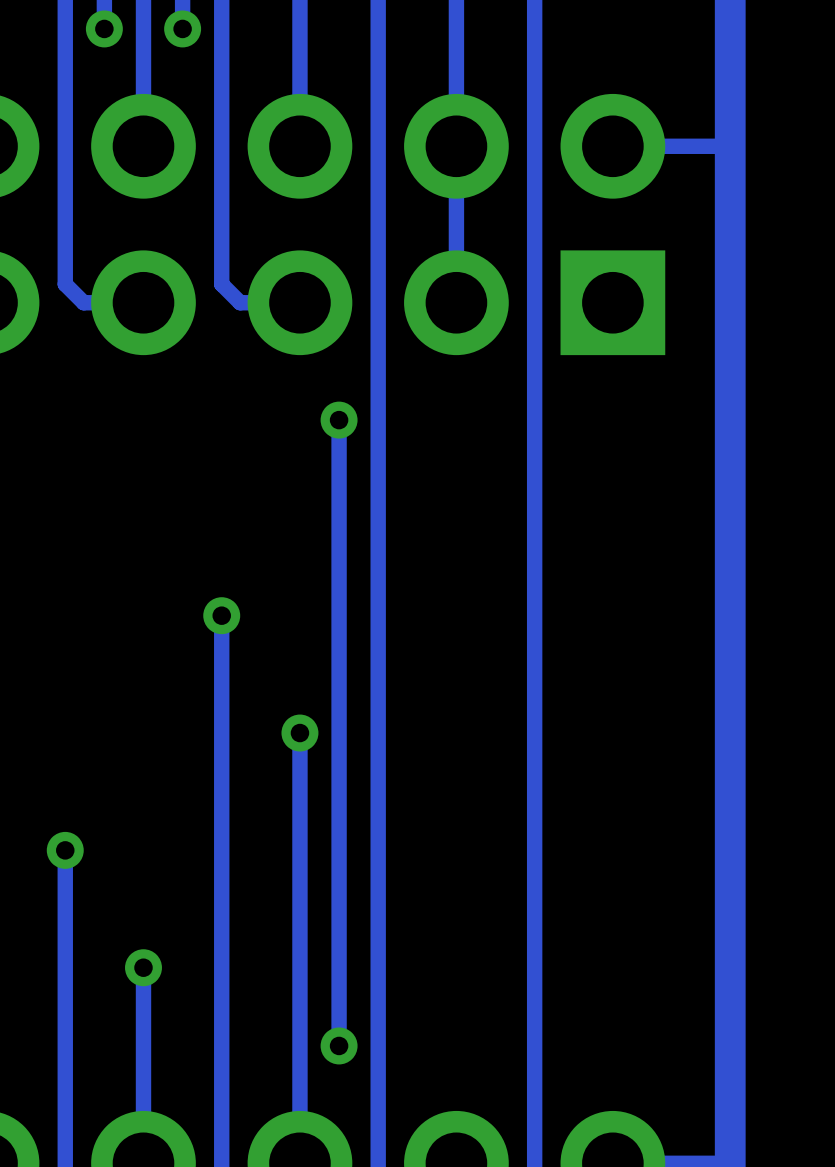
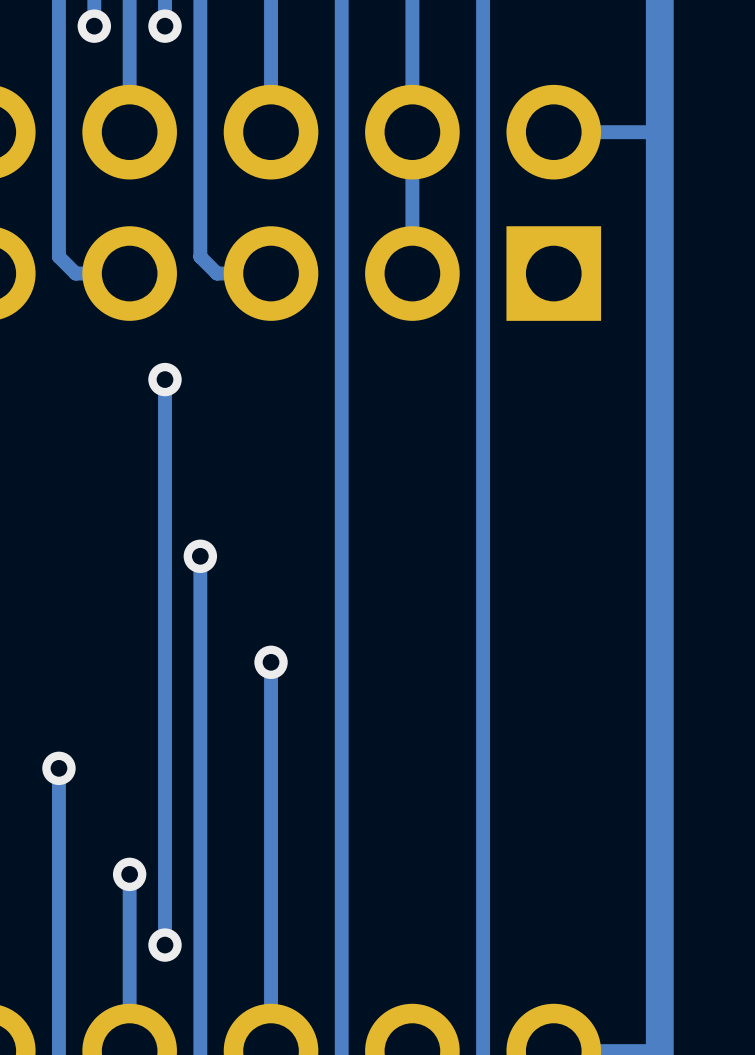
track: (339, 420) (339, 1045) -> (164, 379) (164, 945)
via position: (339, 420) -> (164, 379)
via position: (339, 1045) -> (164, 945)

